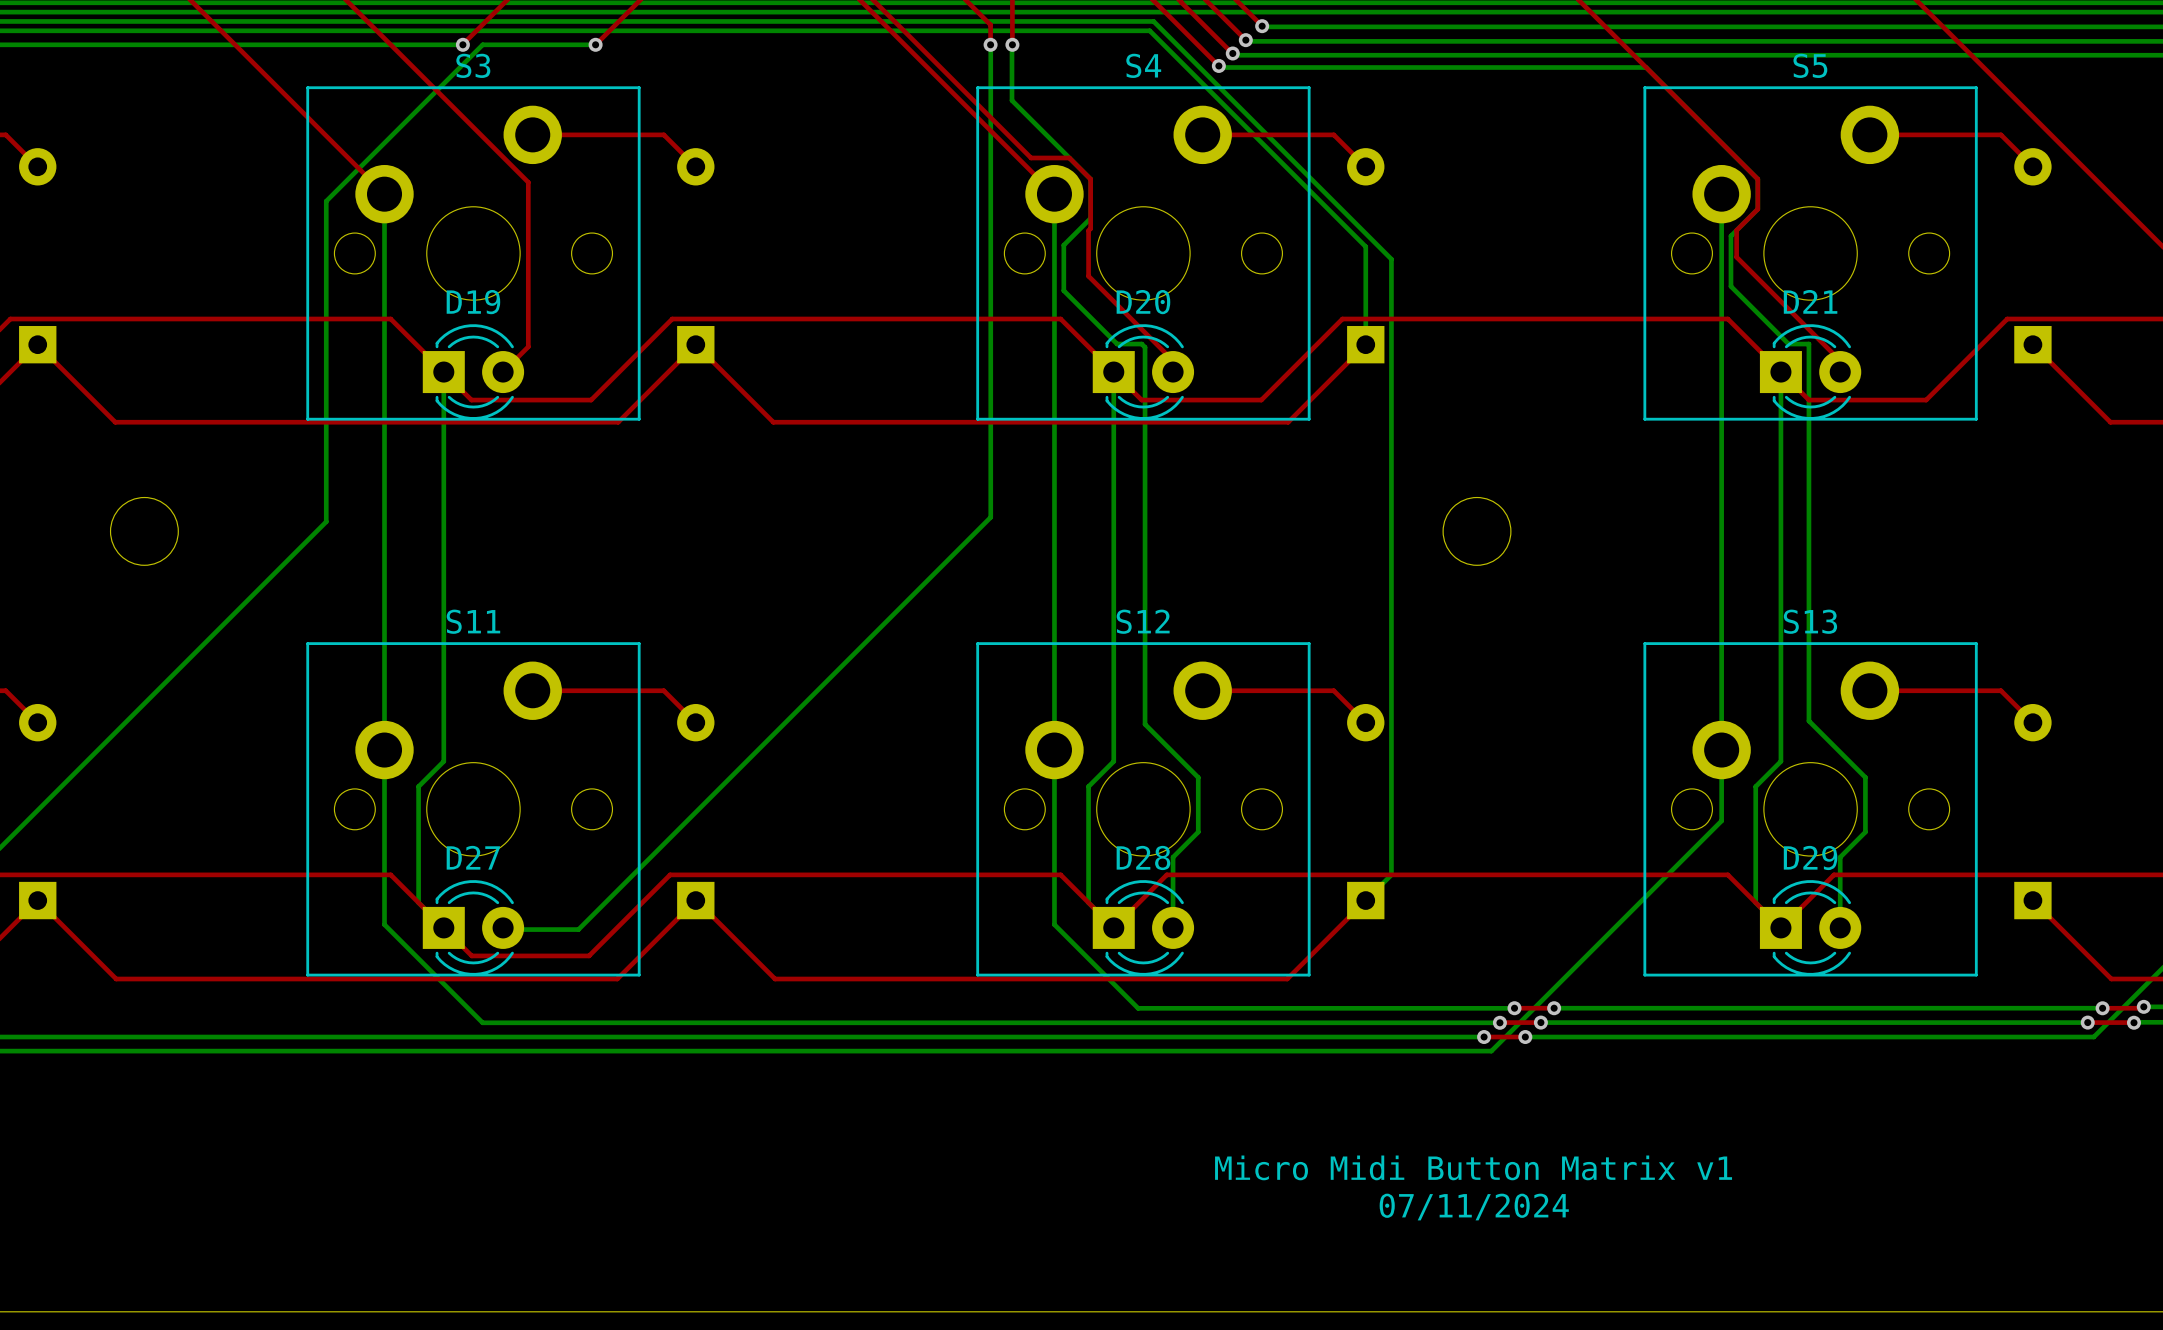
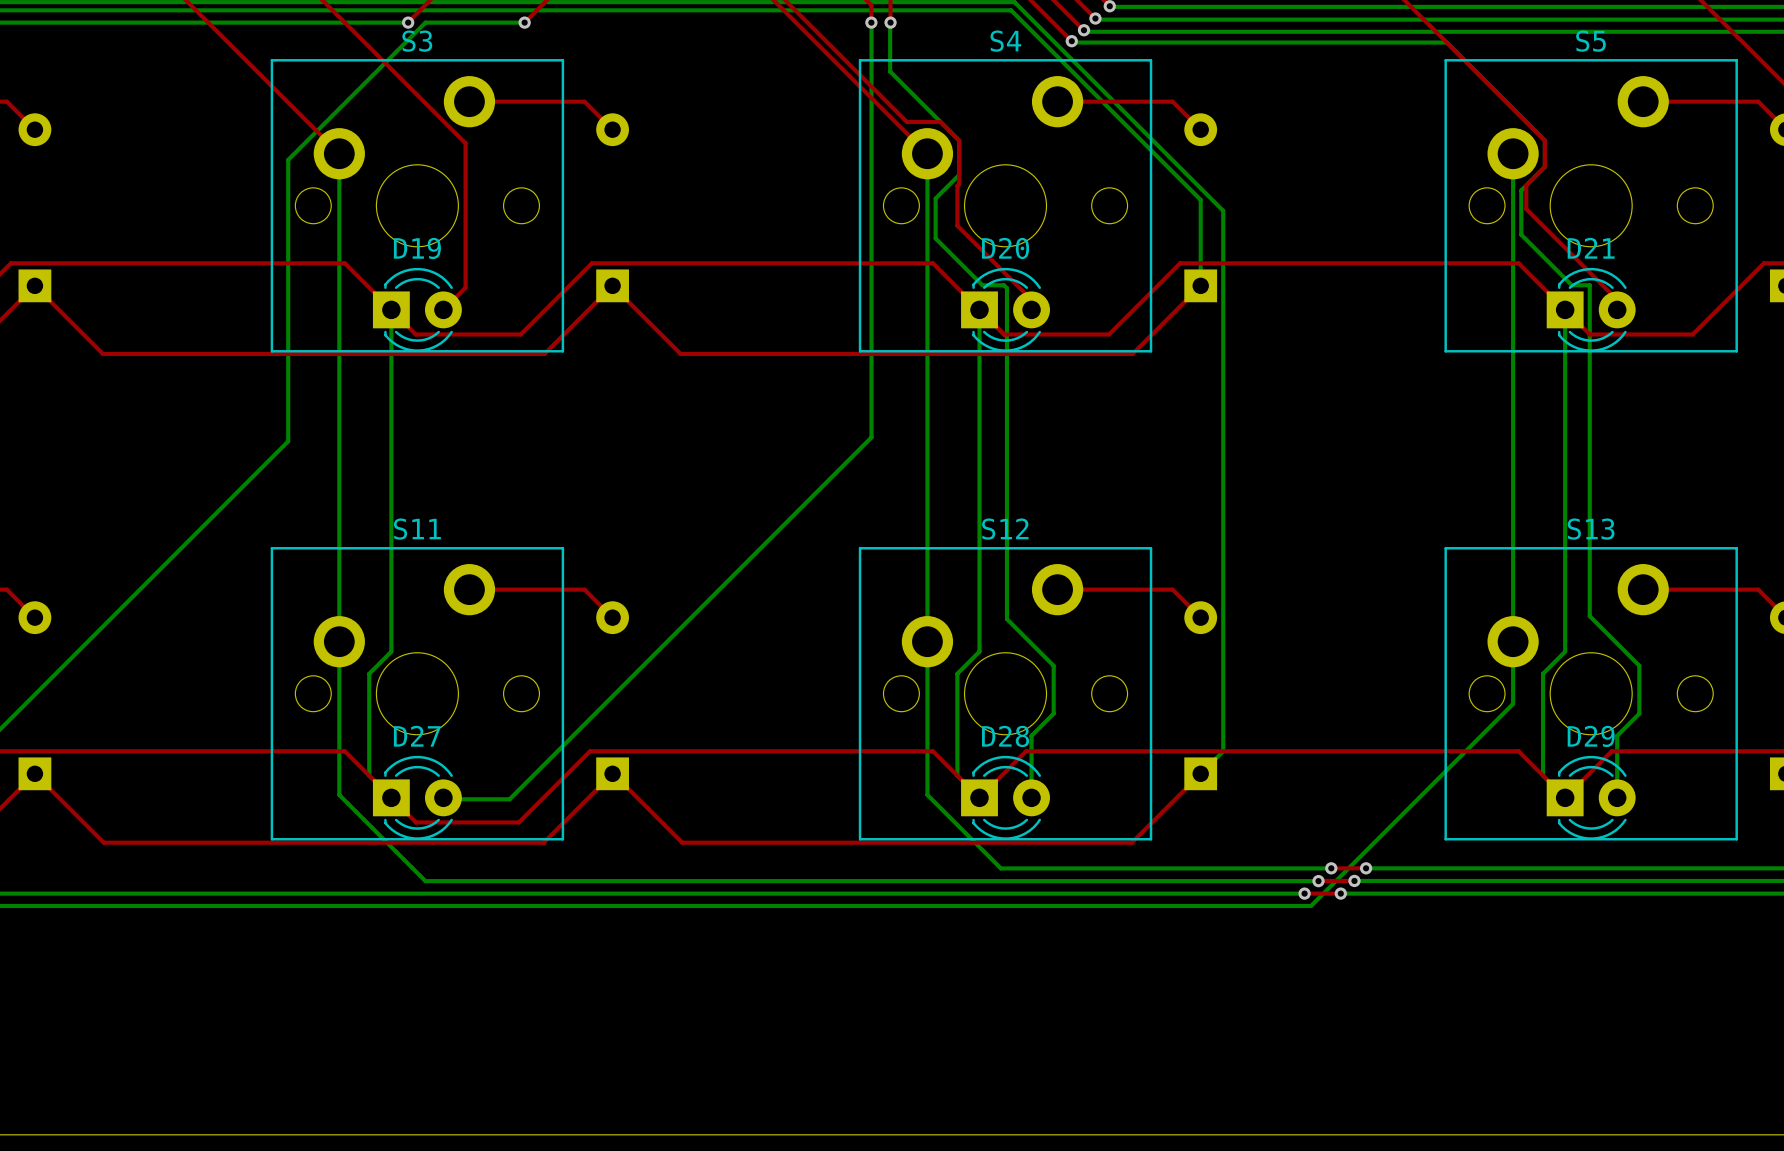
round board edge: [109, 496, 179, 566] -> none
round board edge: [1442, 496, 1512, 566] -> none
text: Micro Midi Button Matrix v1 (1473, 1167) -> none
text: 07/11/2024 (1474, 1207) -> none

